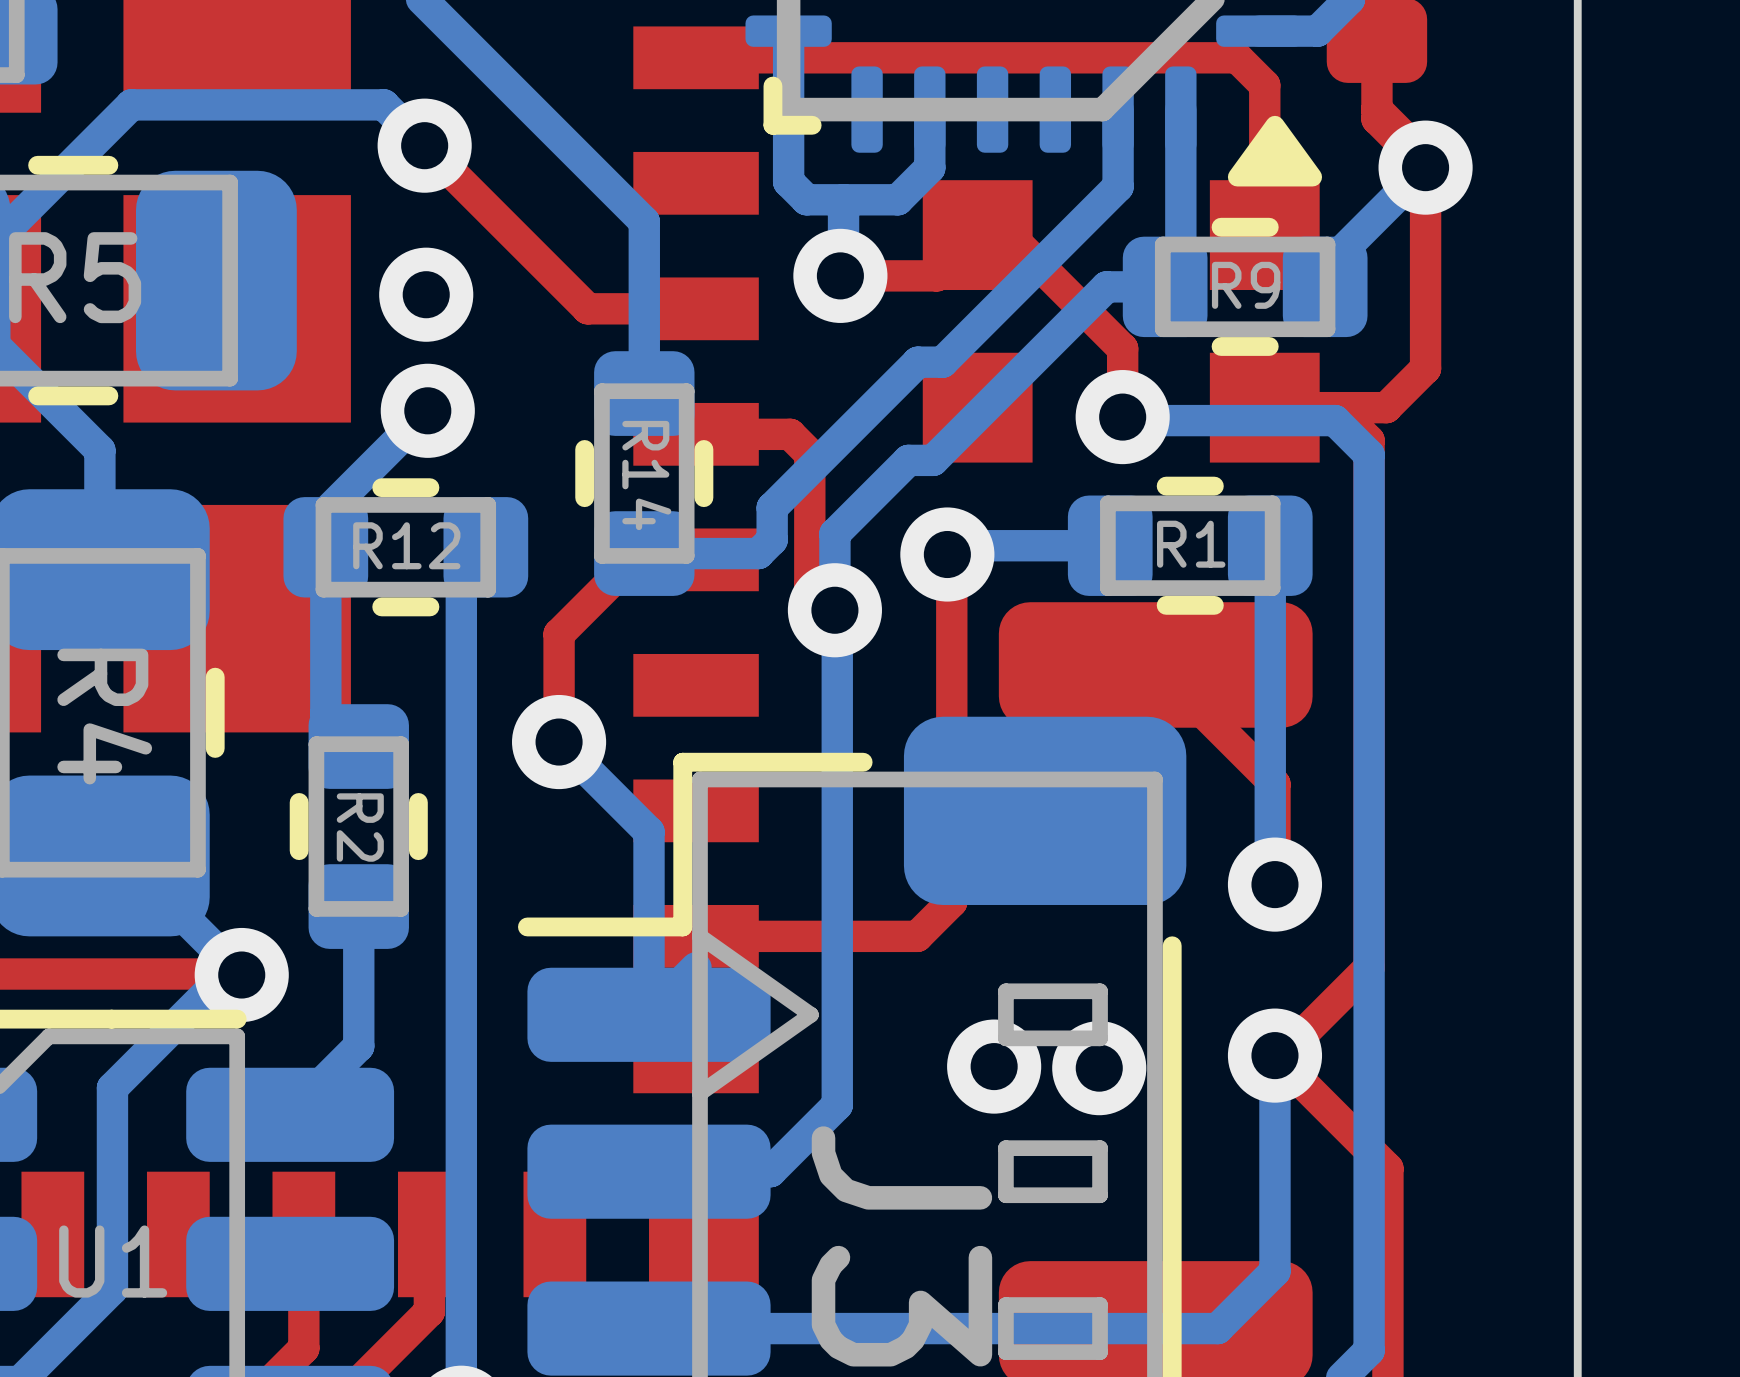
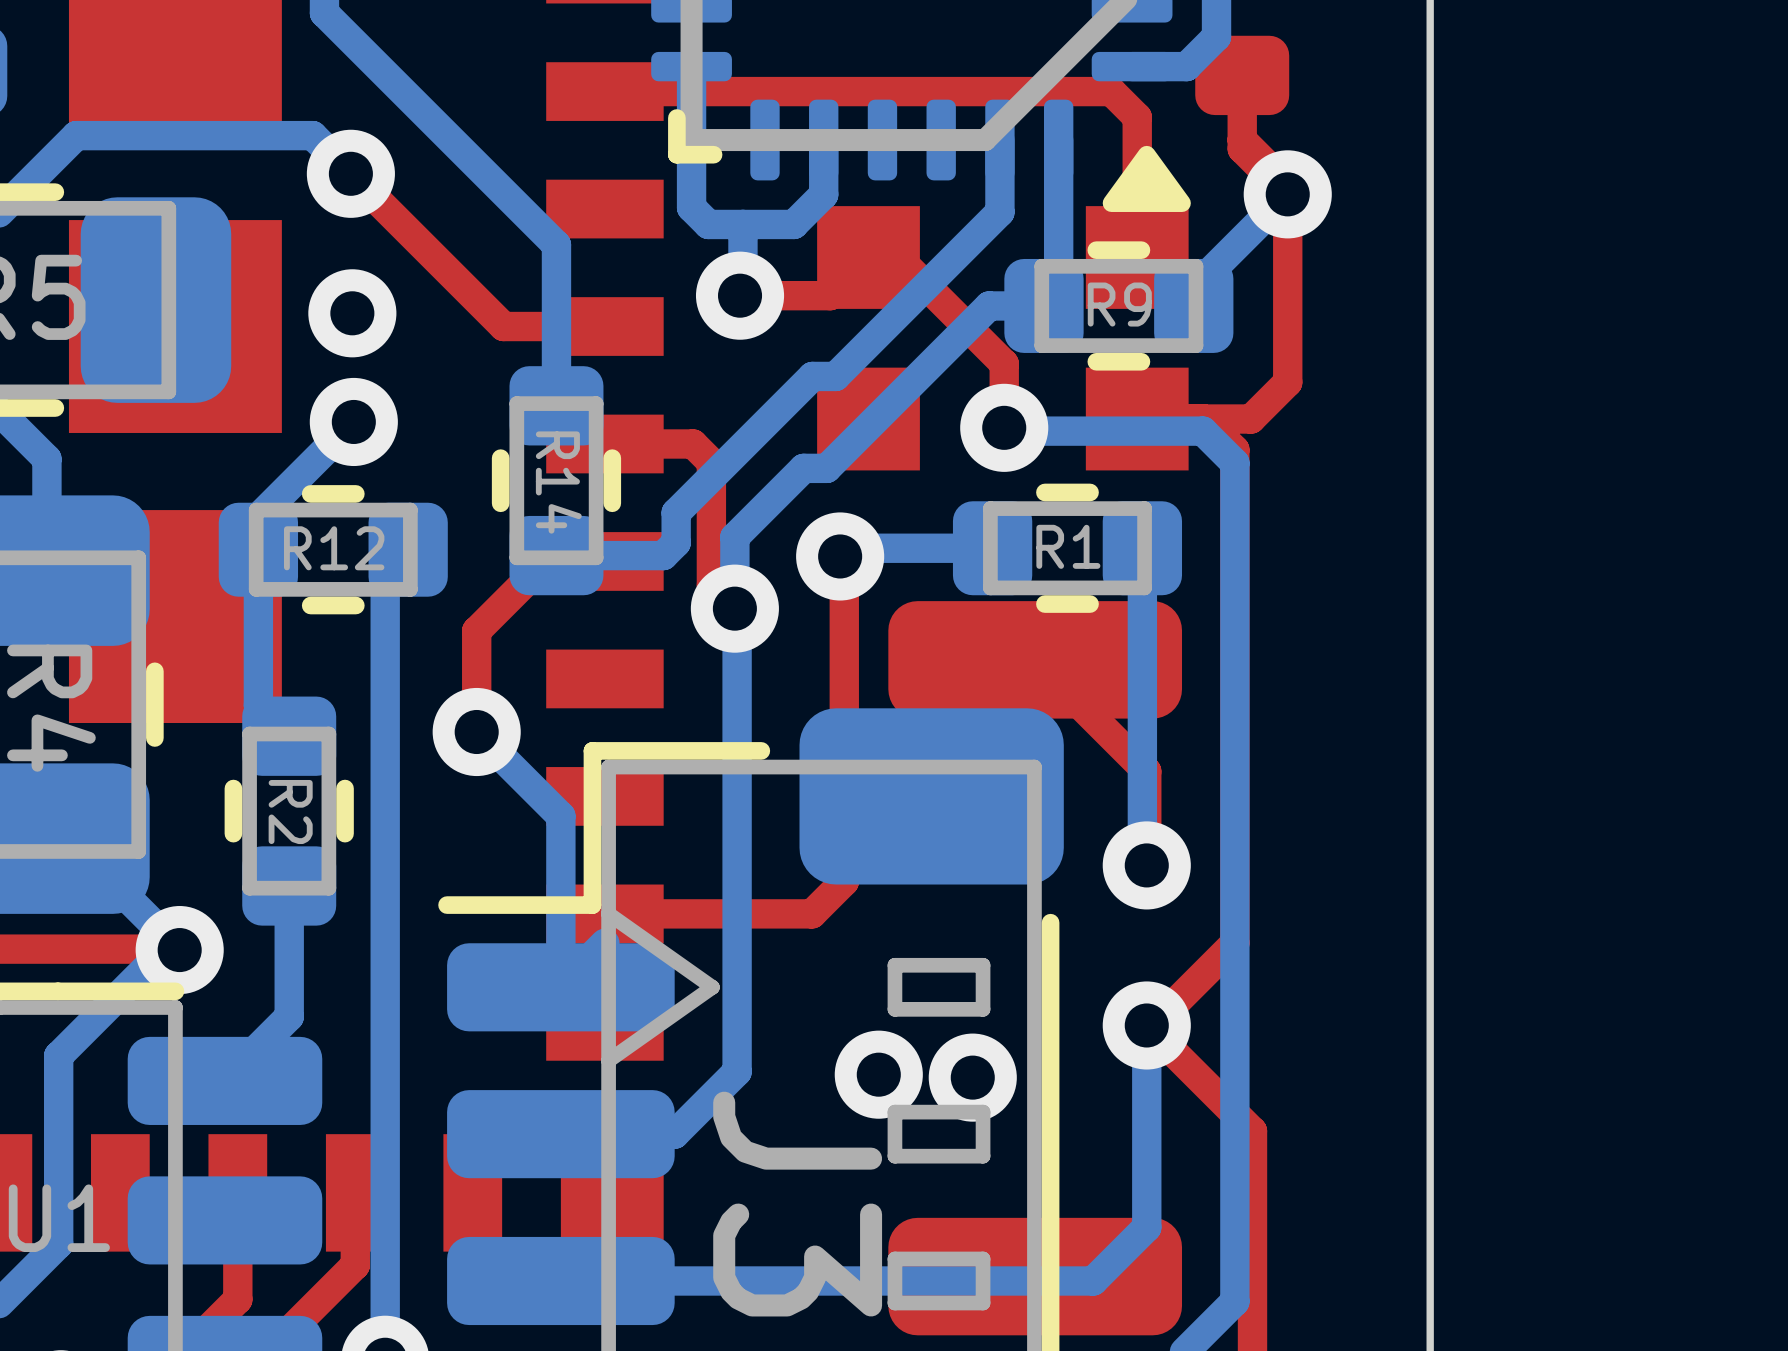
via position: (994, 1066) -> (878, 1074)
via position: (1099, 1068) -> (972, 1077)

